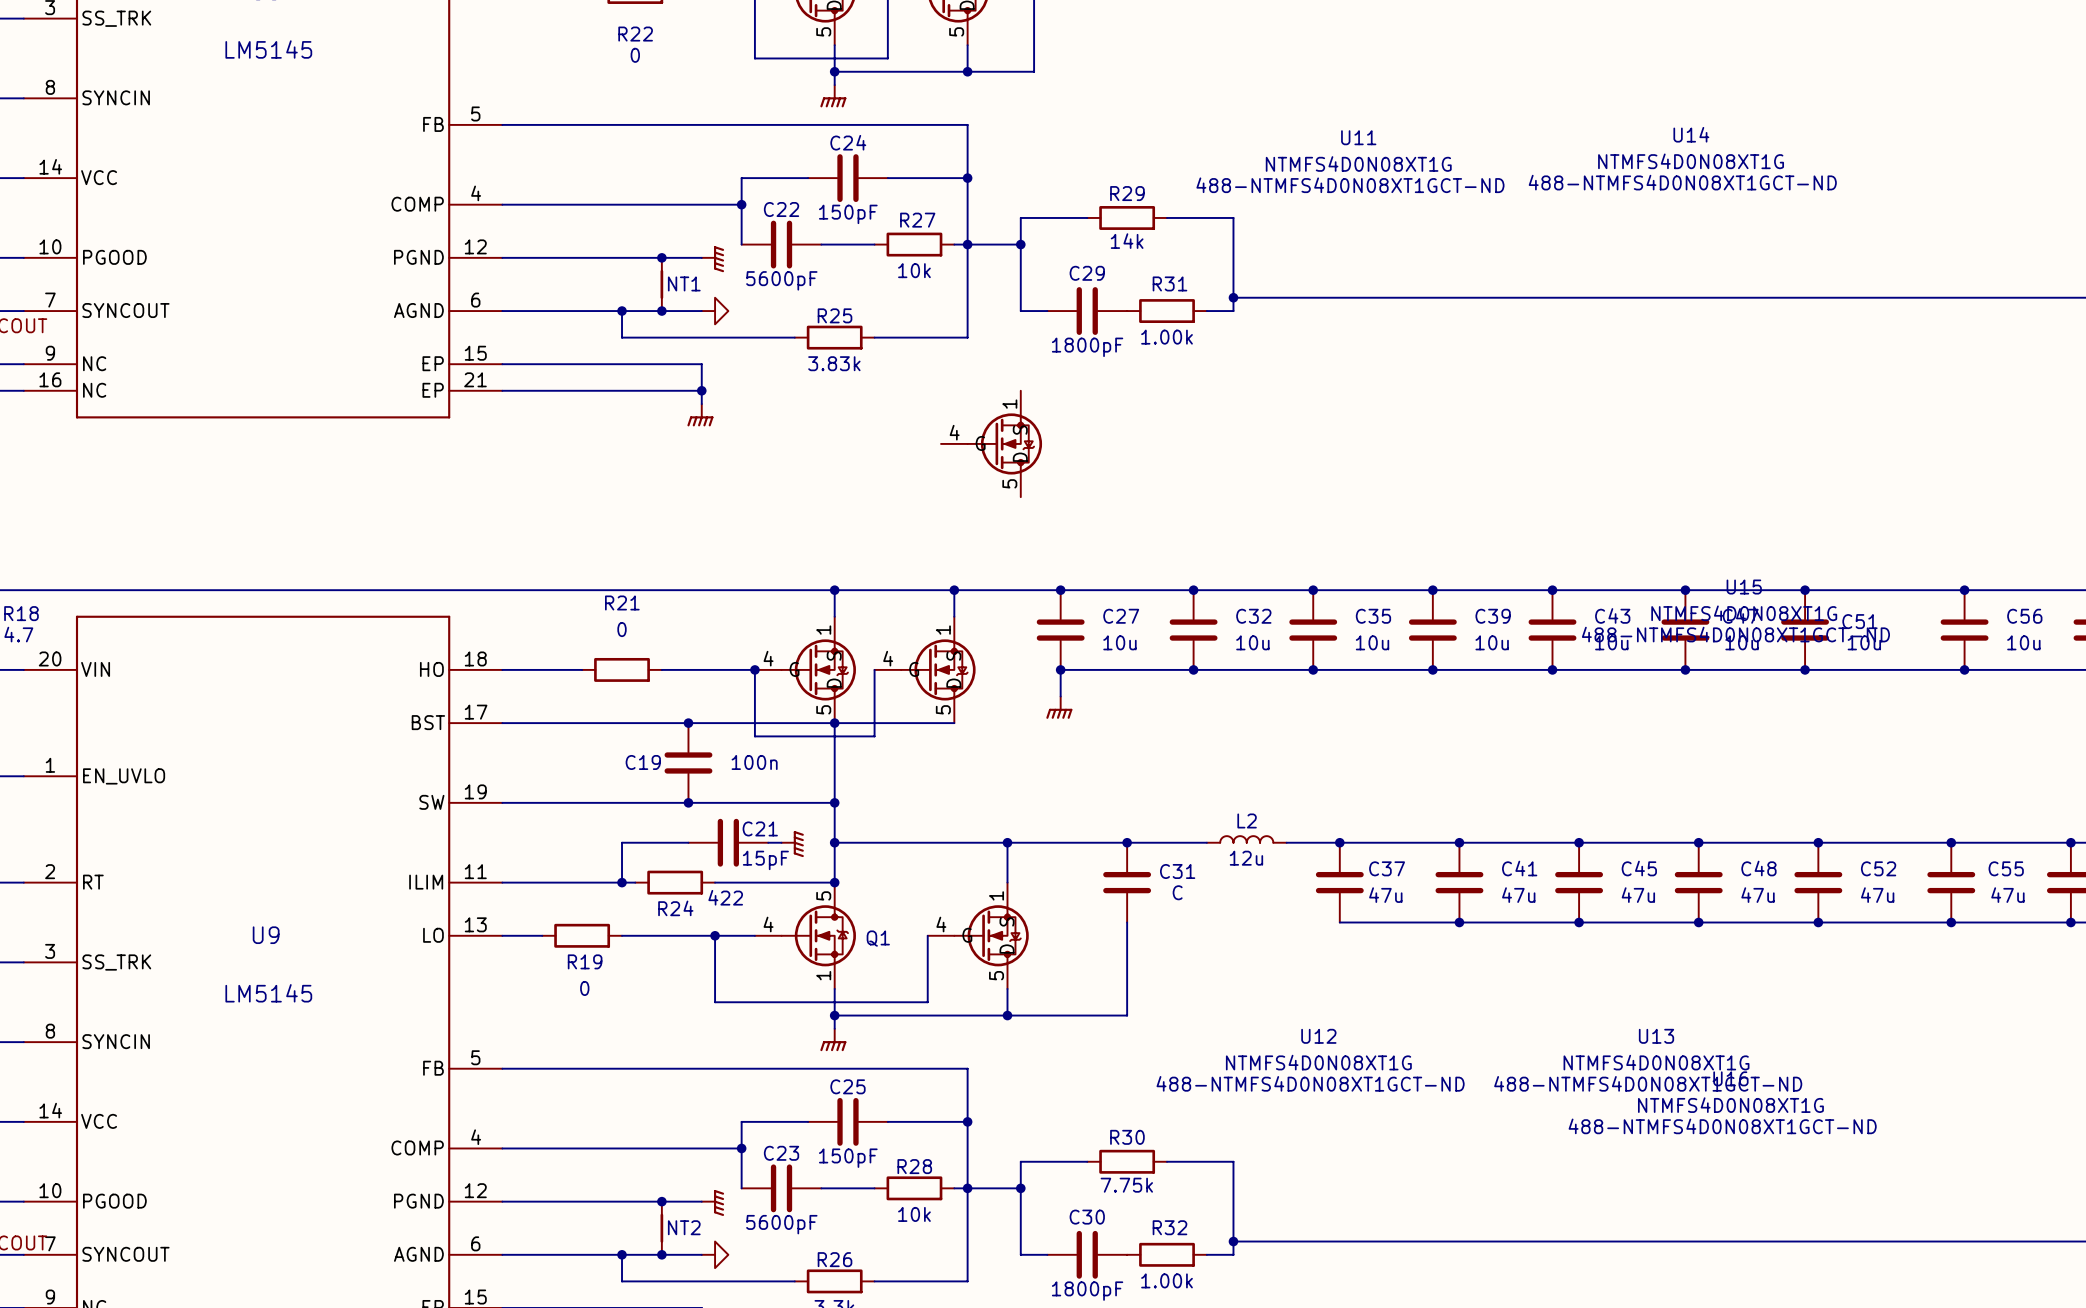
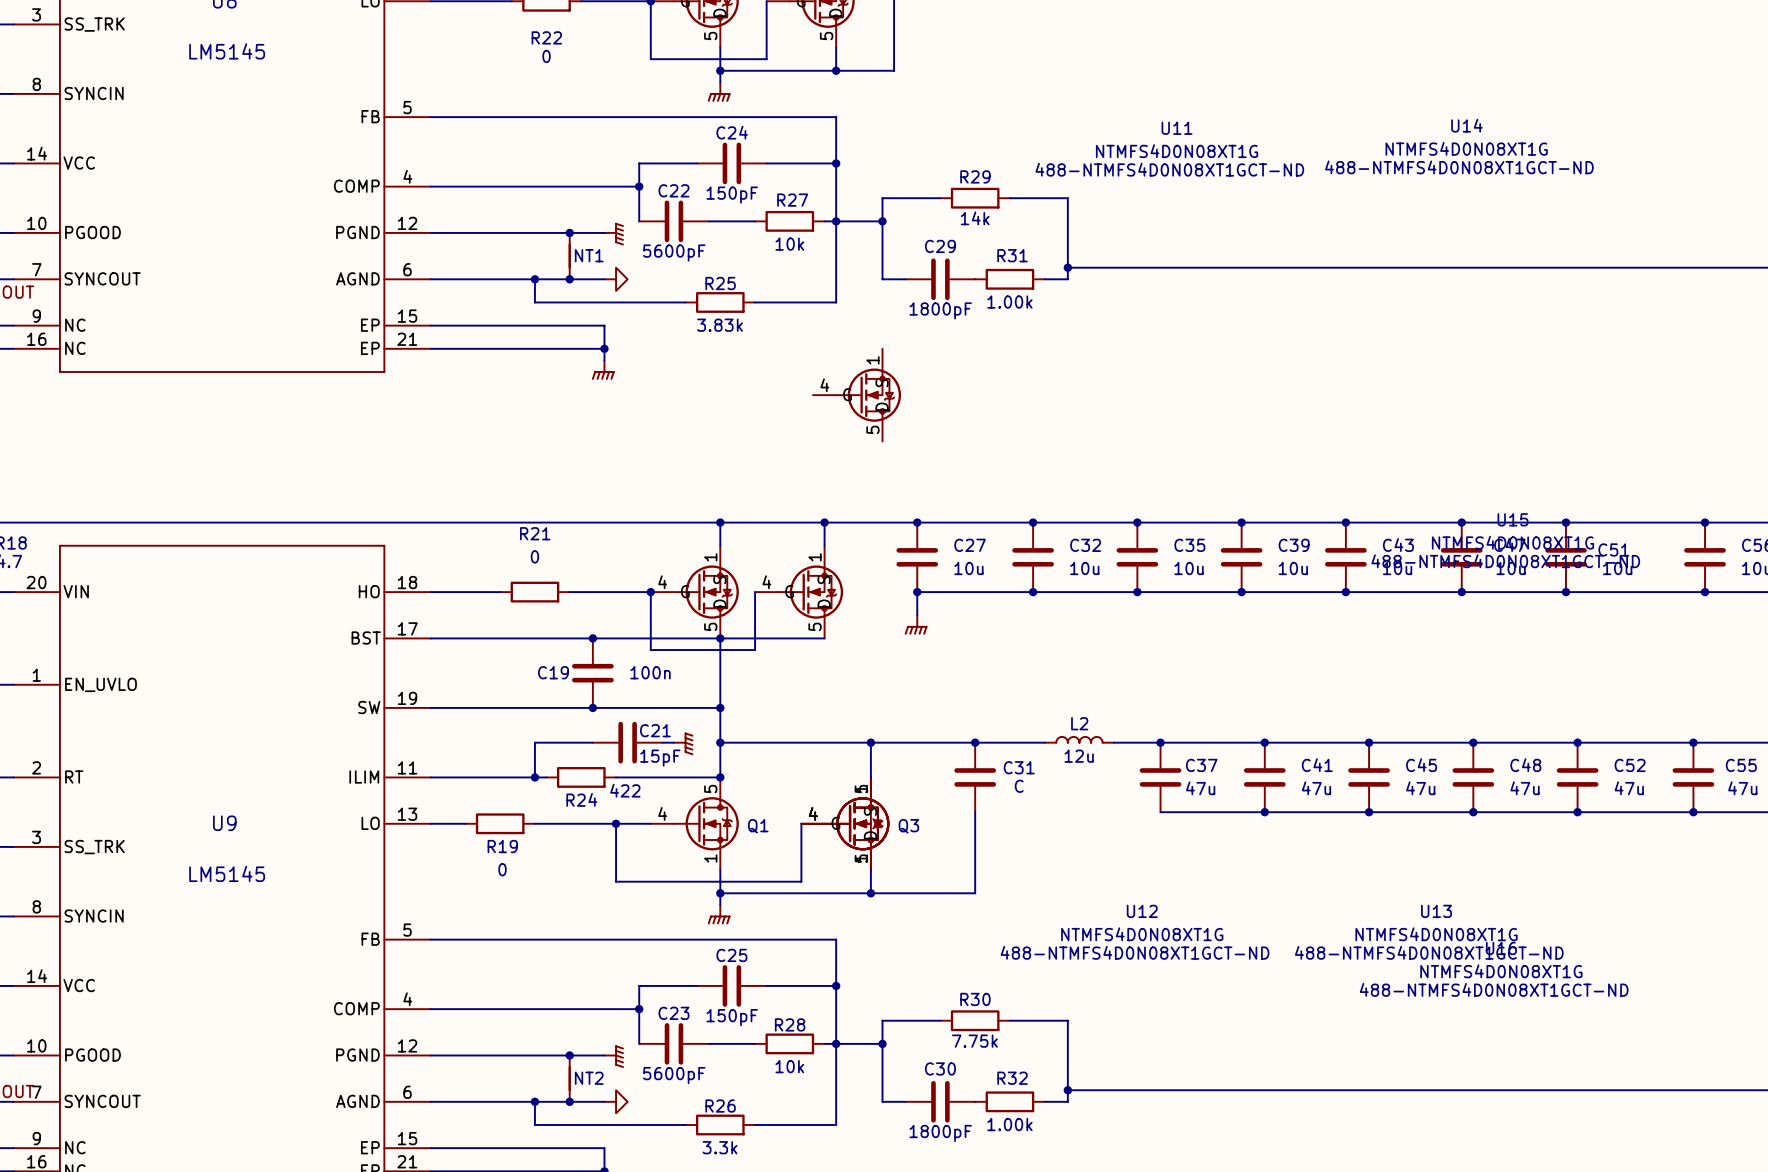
Q3: none -> (845, 823)

